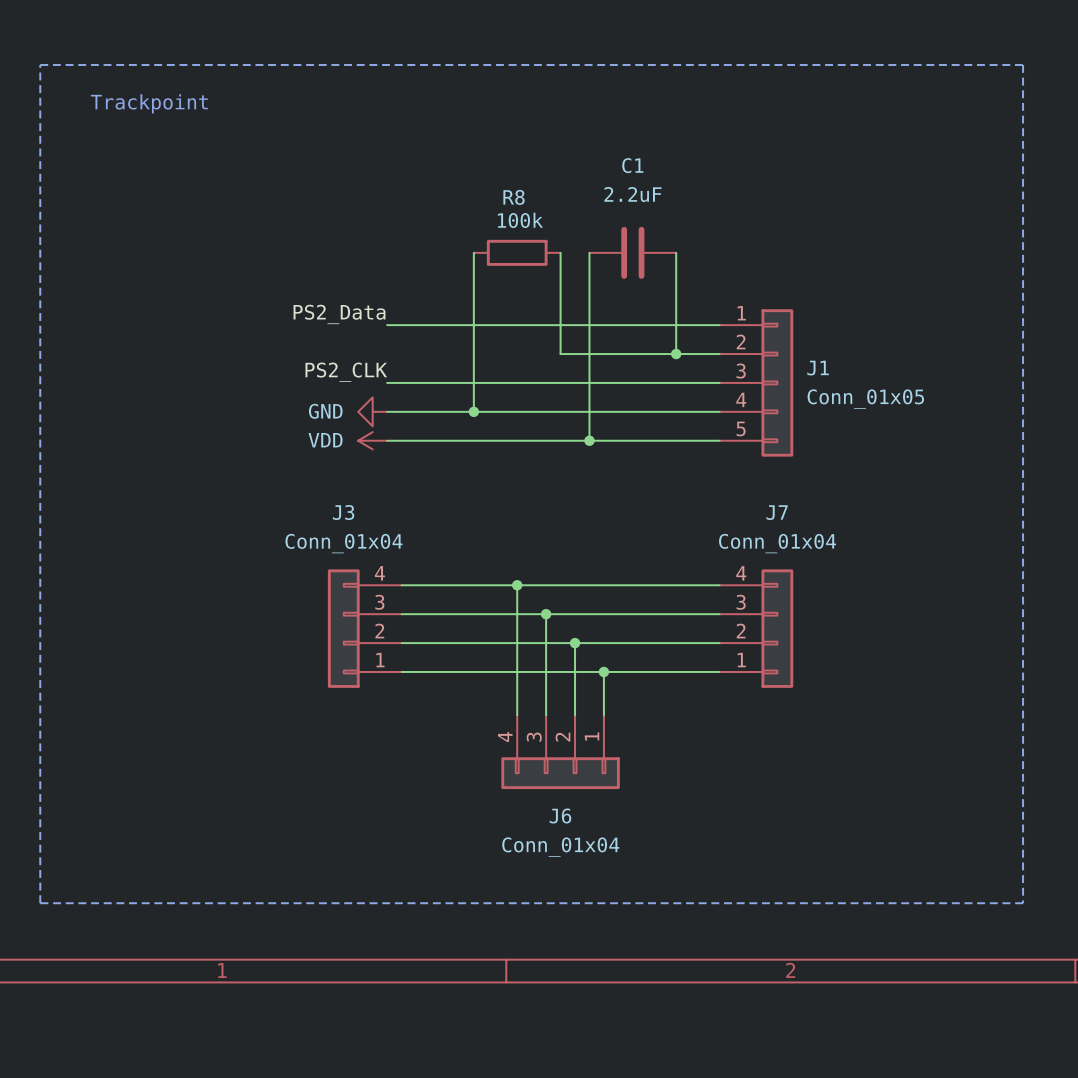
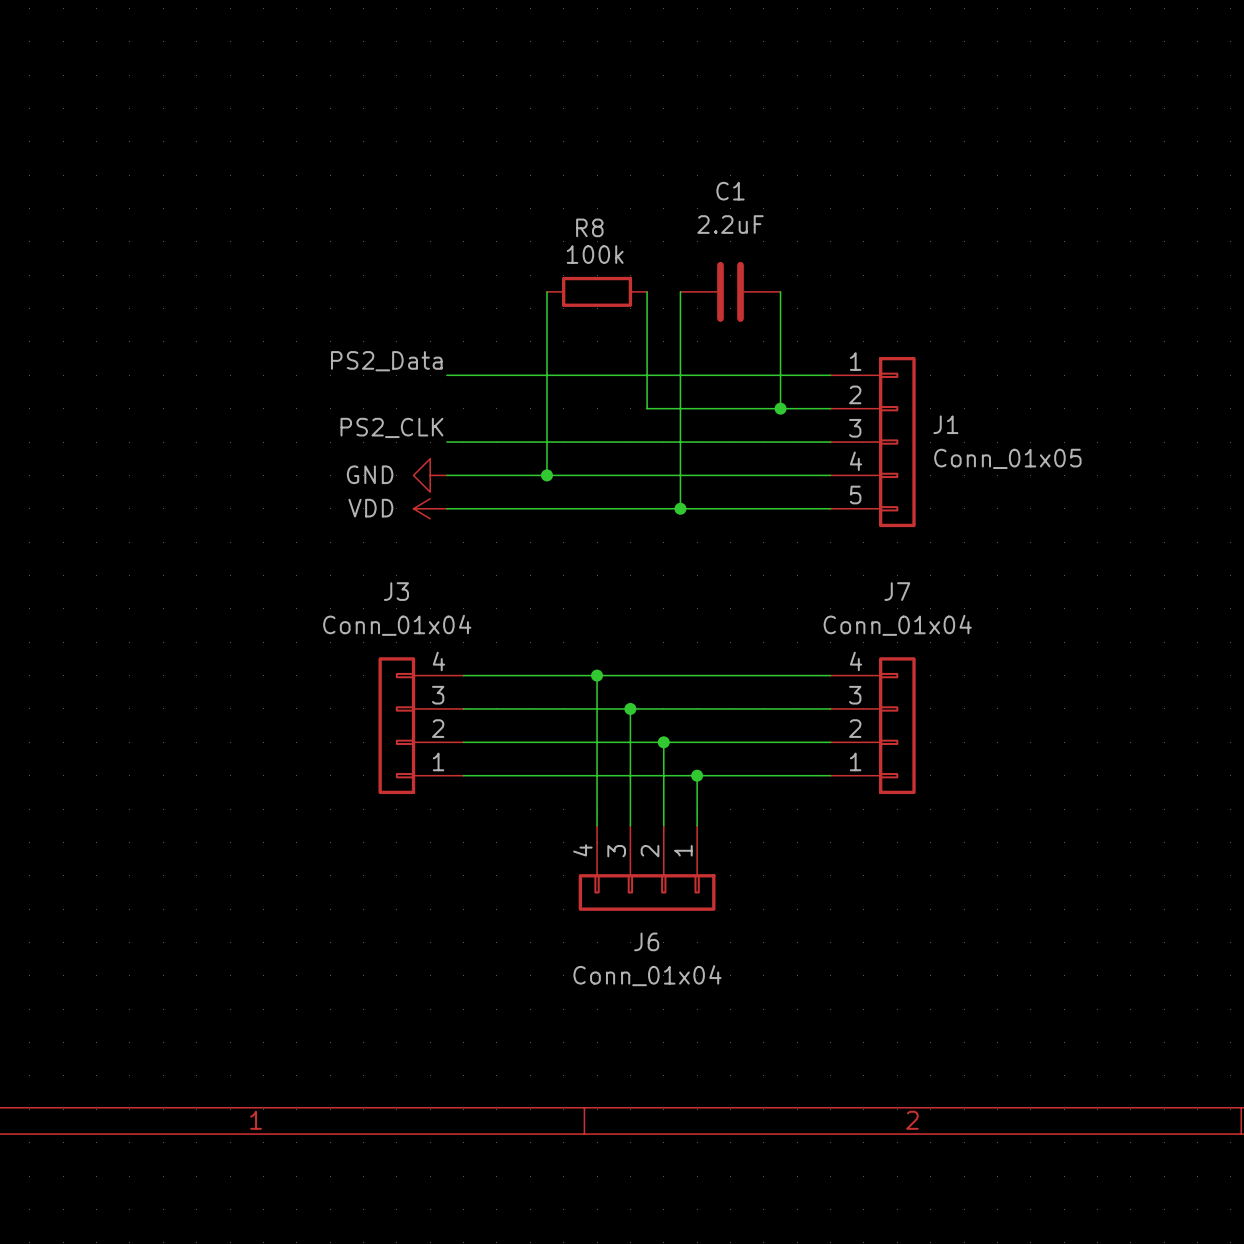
line: (40, 64) (1023, 64) (1023, 903) (40, 903) (40, 64) -> none
text: Trackpoint (149, 103) -> none

